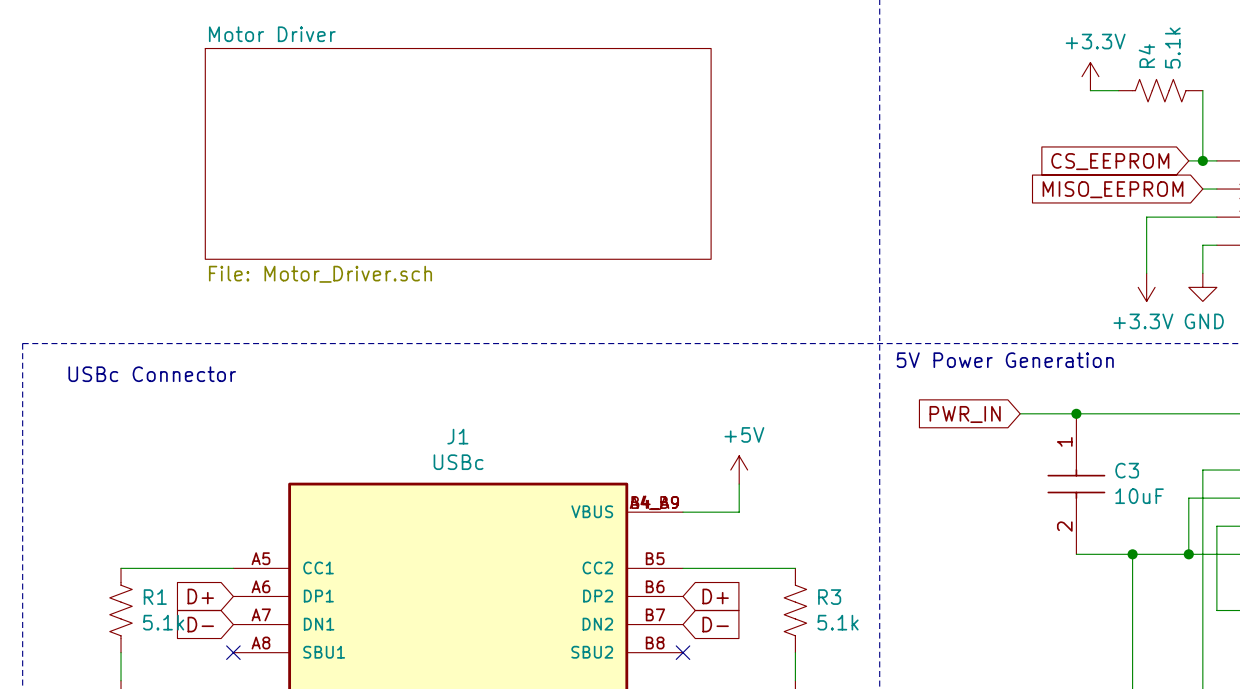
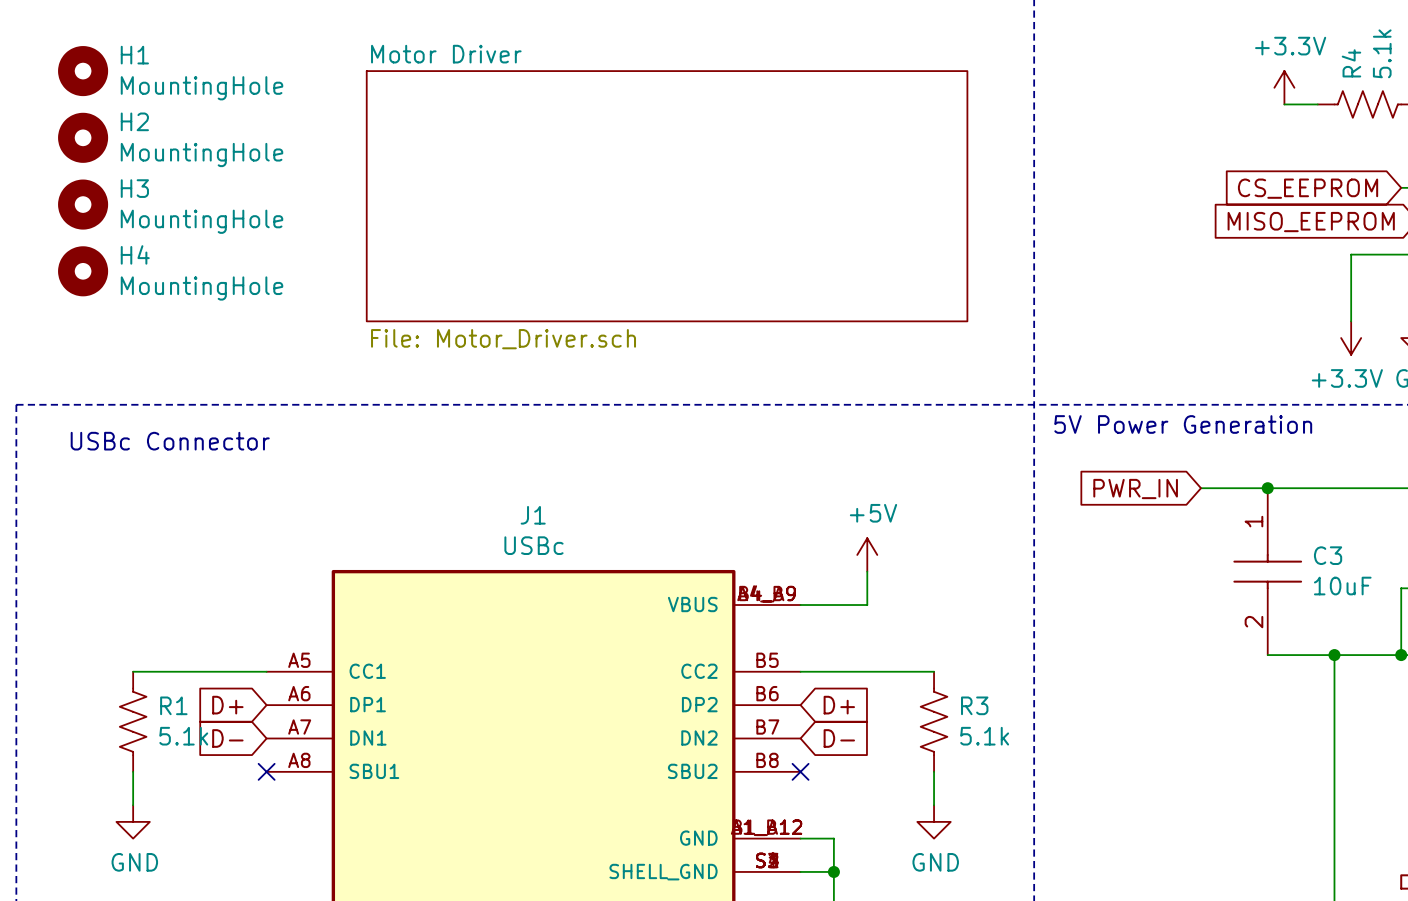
H1: none -> MountingHole (83, 71)
H2: none -> MountingHole (83, 137)
sheet Motor Driver position: (458, 153) -> (667, 196)
H3: none -> MountingHole (83, 204)
H4: none -> MountingHole (83, 271)

